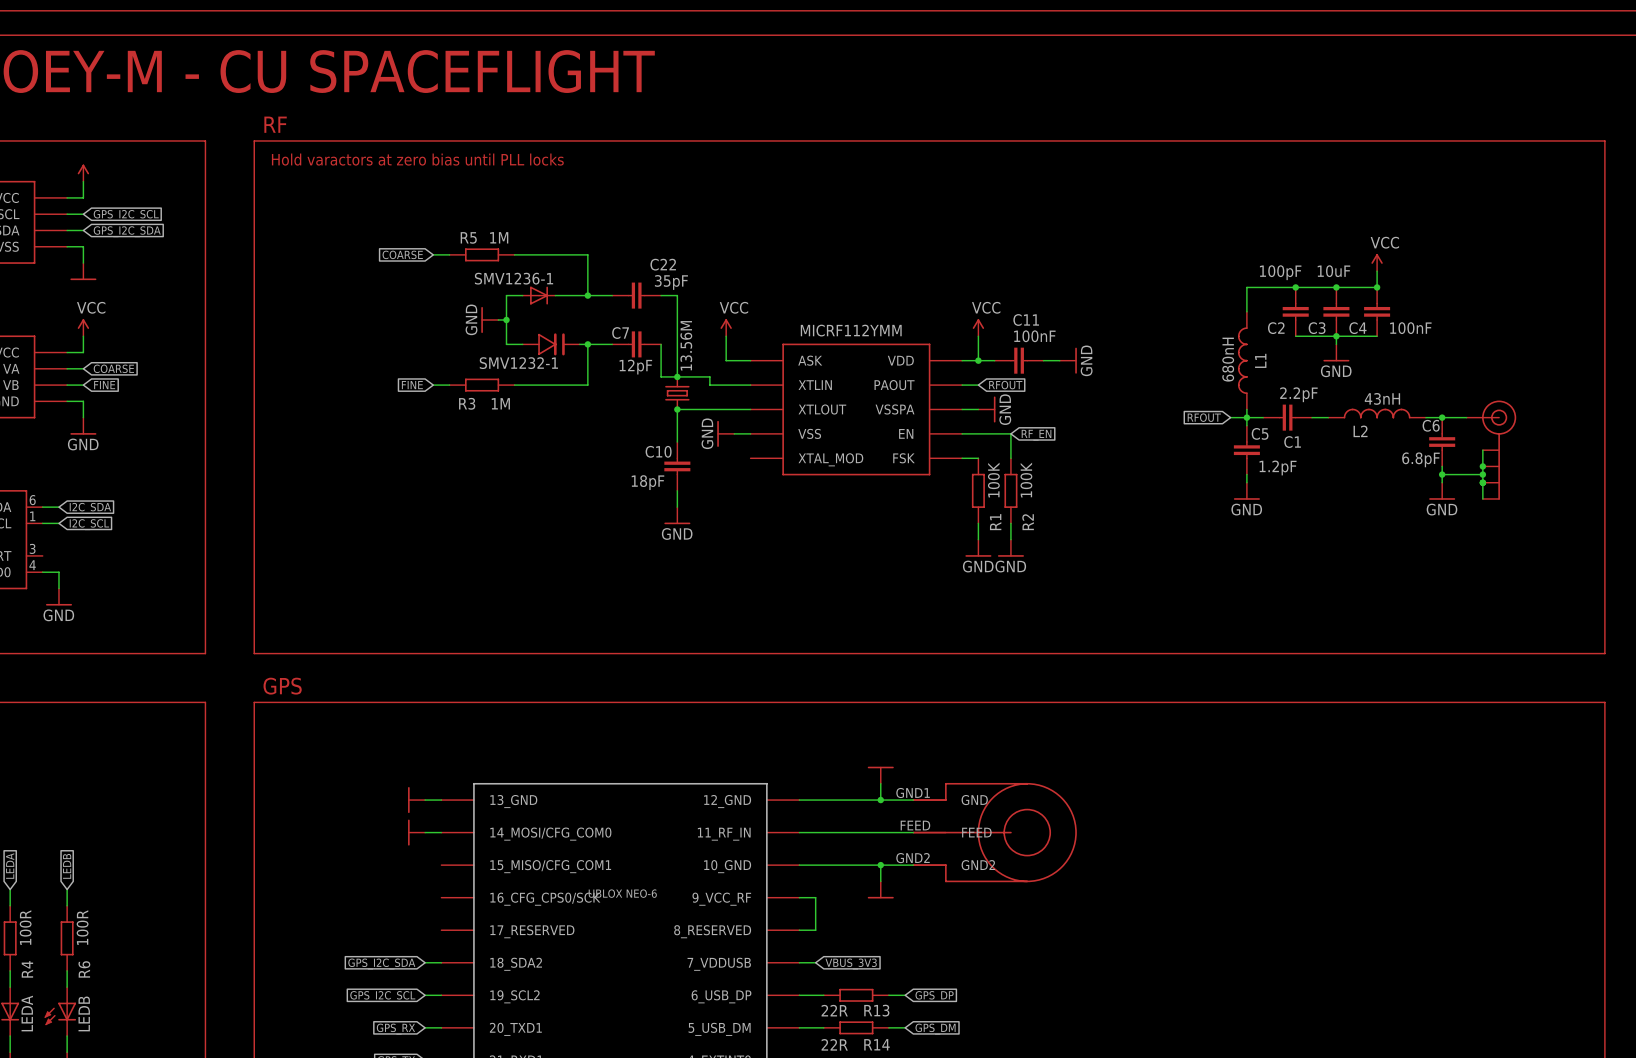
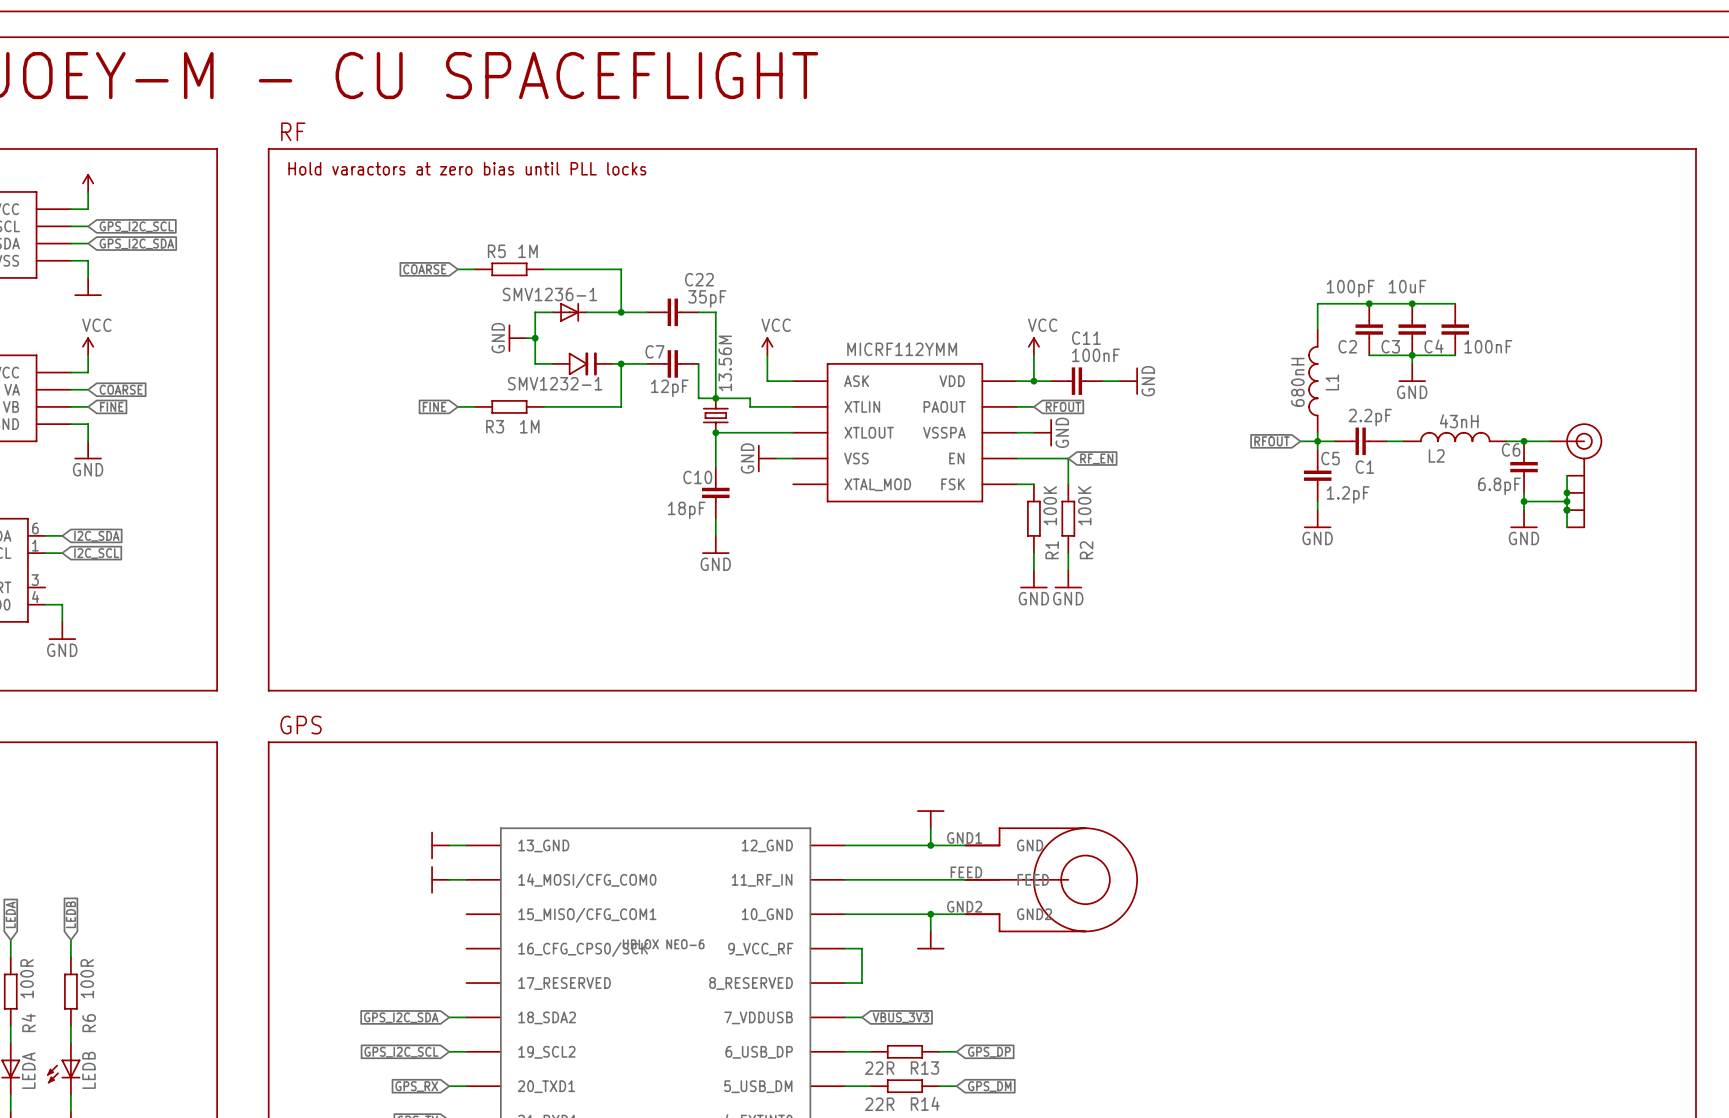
power symbol: VCC (1377, 262) -> none
wire: (1377, 271) (1377, 287) -> none
junction: (1377, 287) -> none

